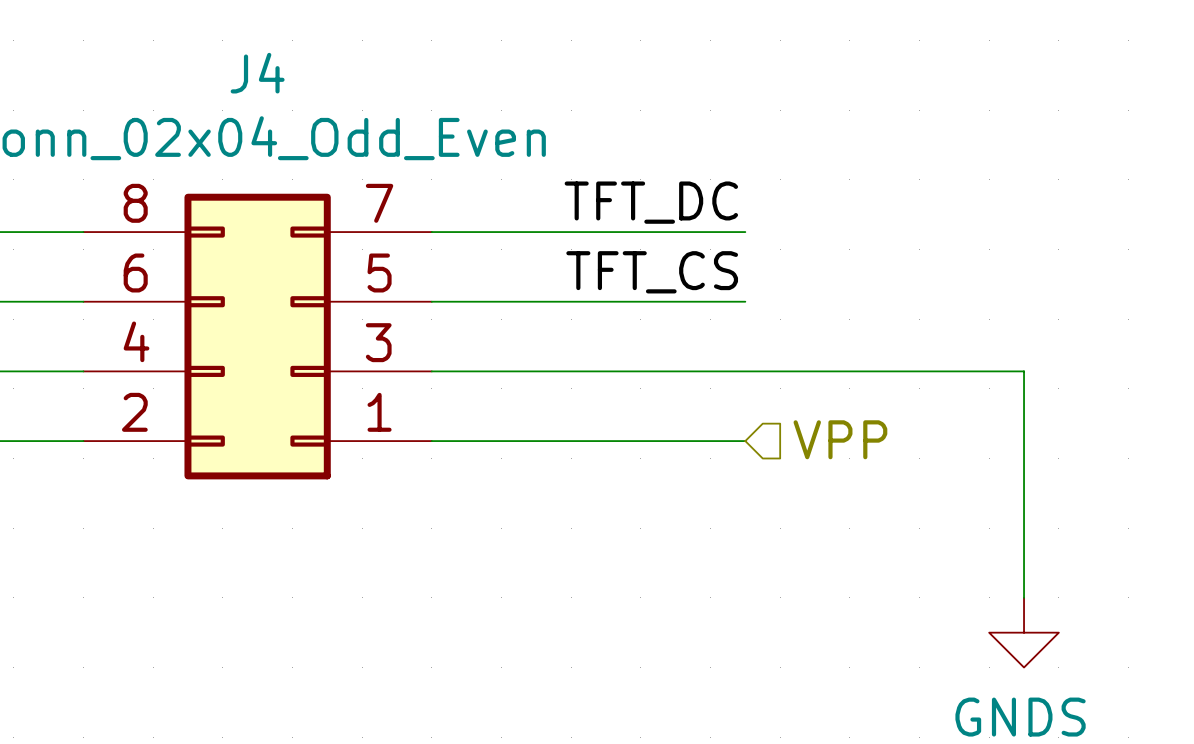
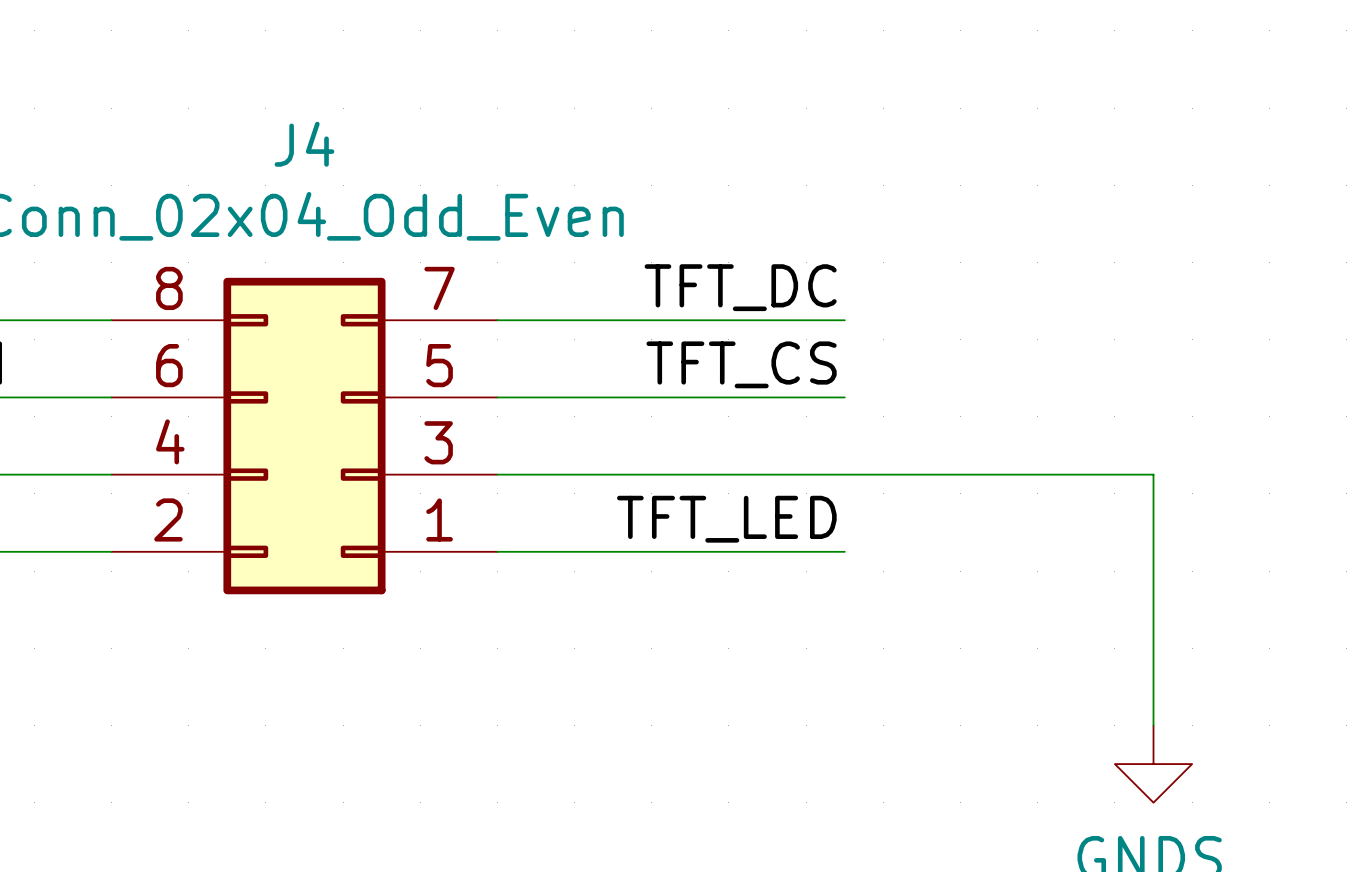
label: none -> TFT_LED (726, 519)
hierarchical label: VPP (840, 439) -> none

